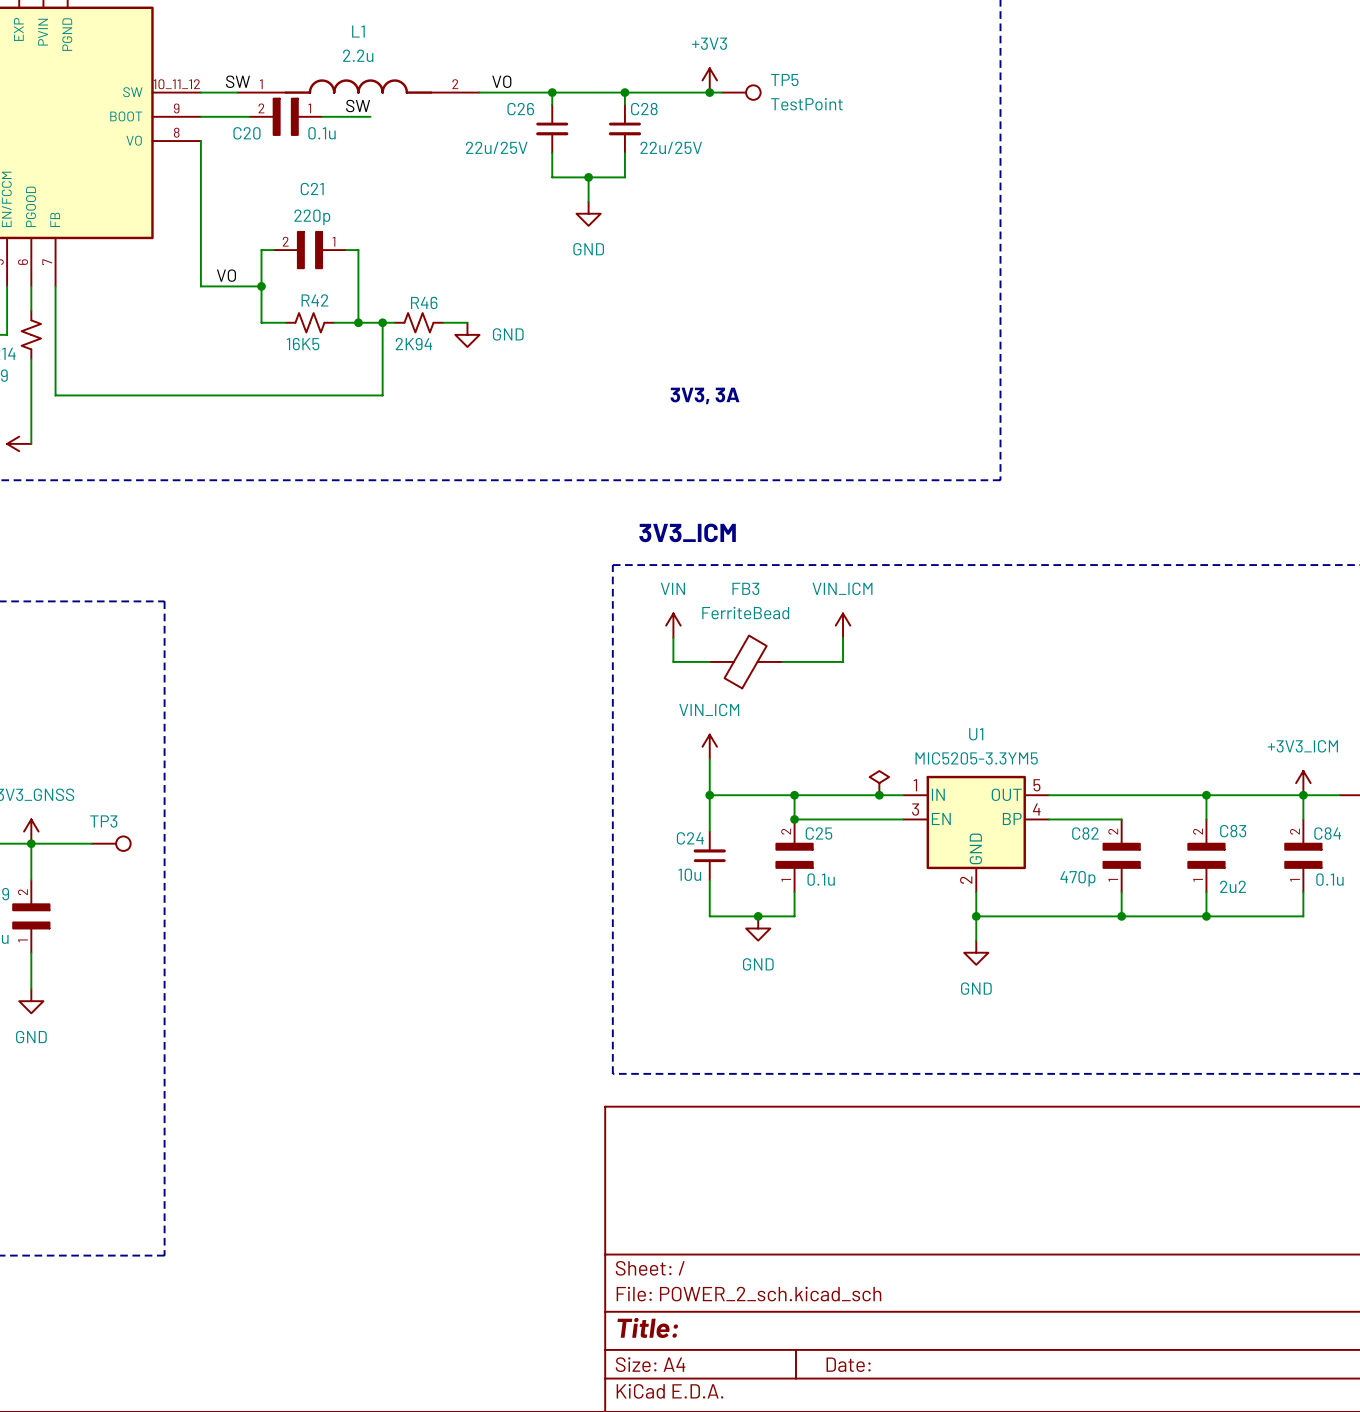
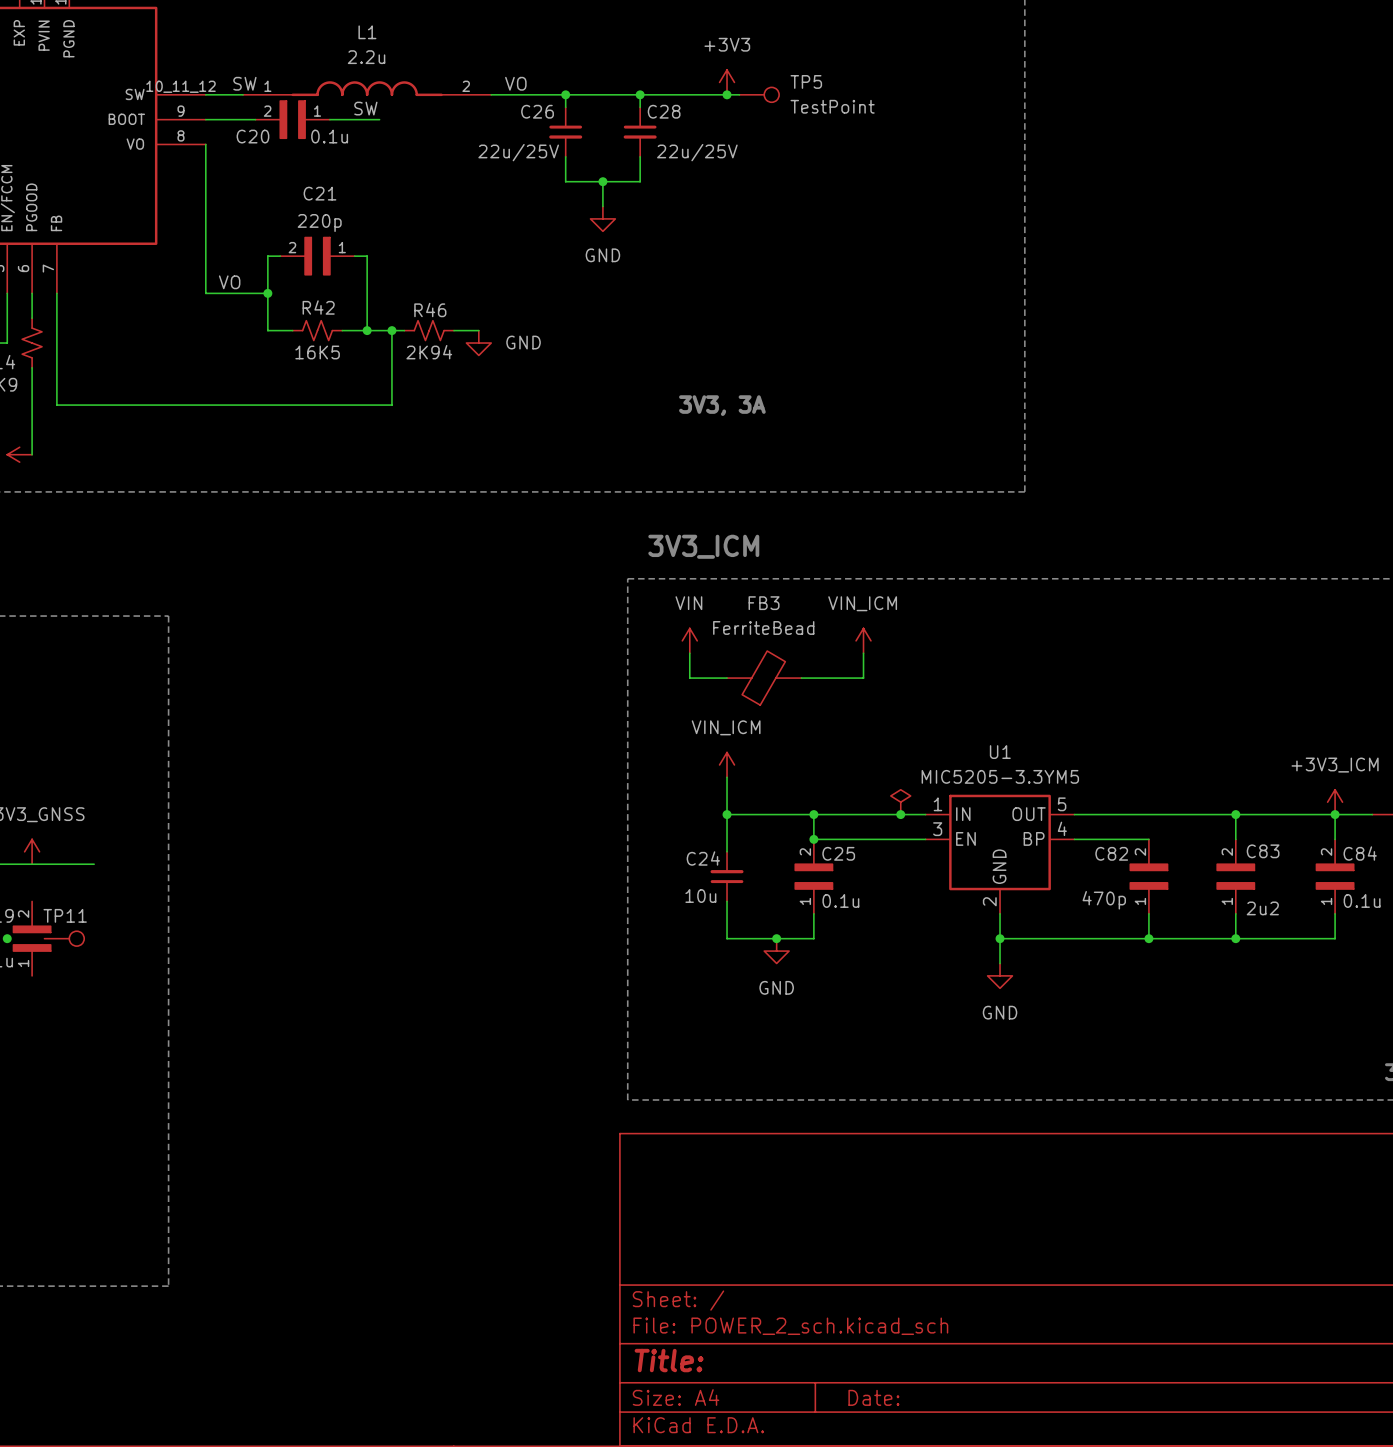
wire: (31, 843) (31, 880) -> none
junction: (31, 843) -> none
TP3: (111, 843) -> none
junction: none -> (7, 938)
TP11: none -> (64, 938)
wire: (31, 952) (31, 989) -> none
power symbol: GND (31, 1001) -> none

